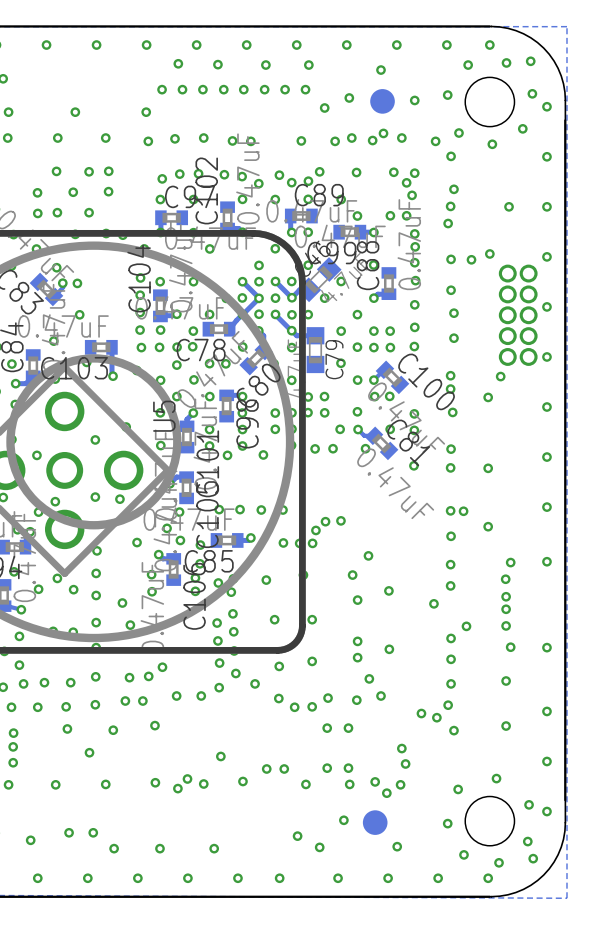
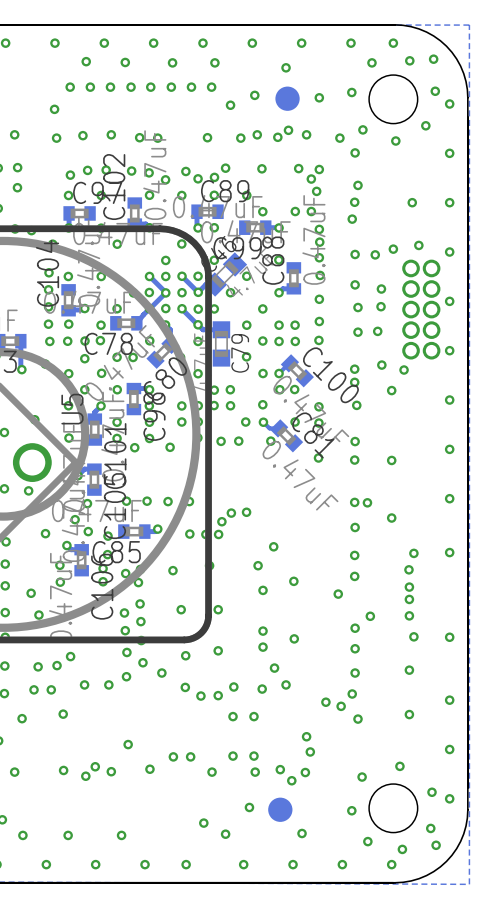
via: none -> (418, 245)
via: none -> (381, 289)
via: none -> (381, 306)
via: none -> (377, 331)
via: none -> (381, 365)

